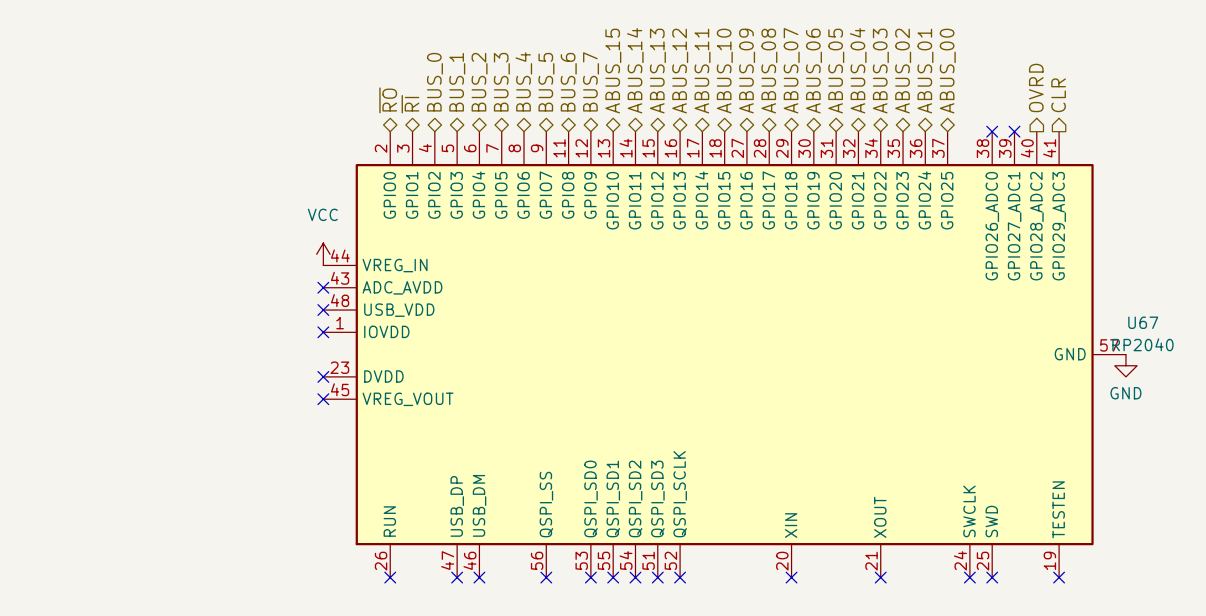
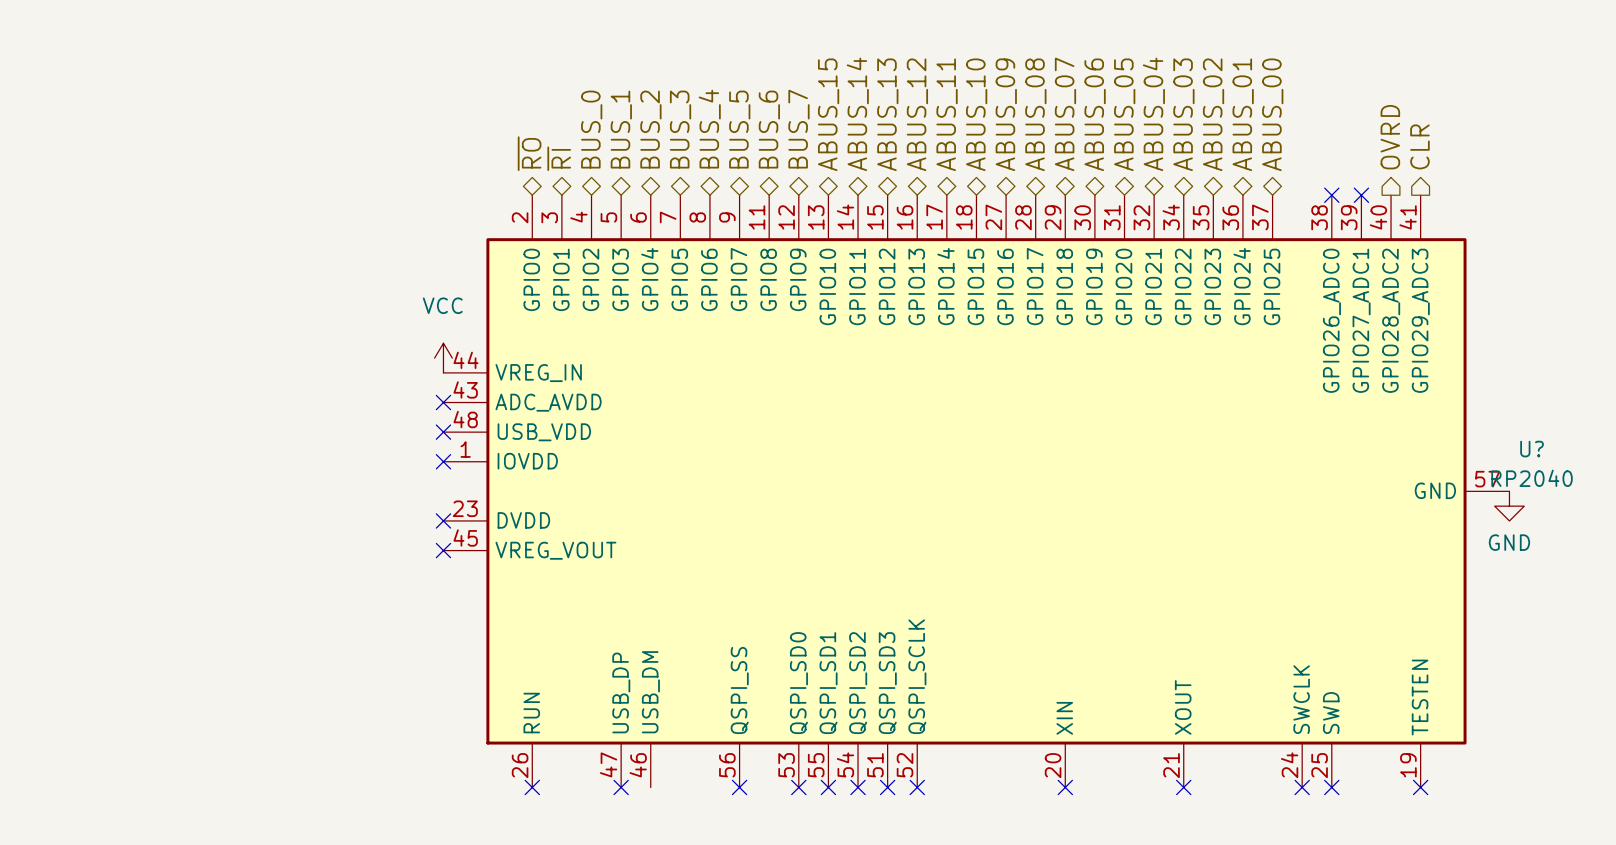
U67 name: U67 (1143, 322) -> U? (1532, 449)
no-connect mark: (479, 577) -> none

